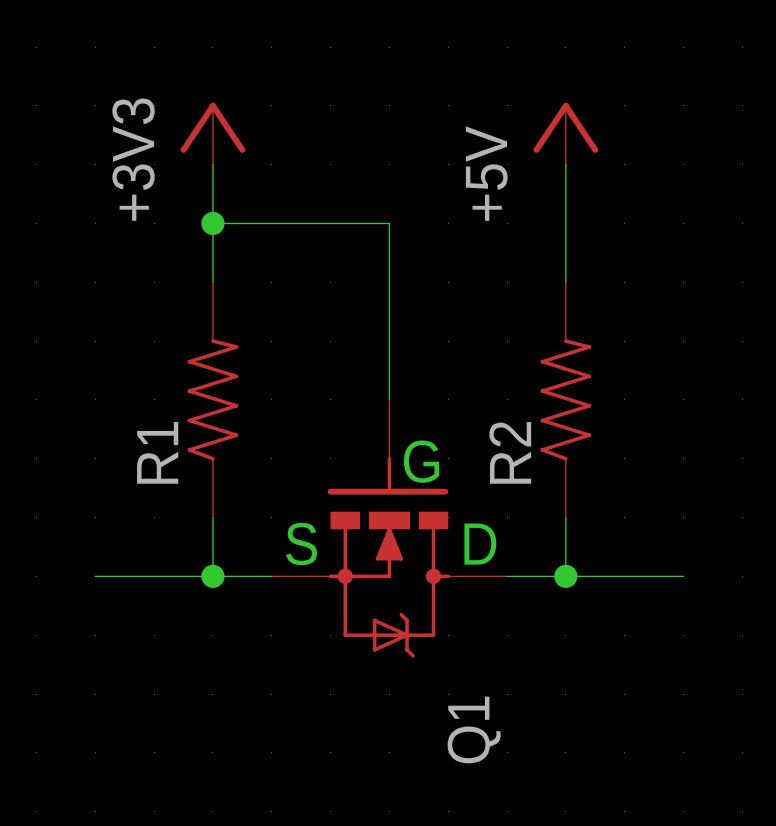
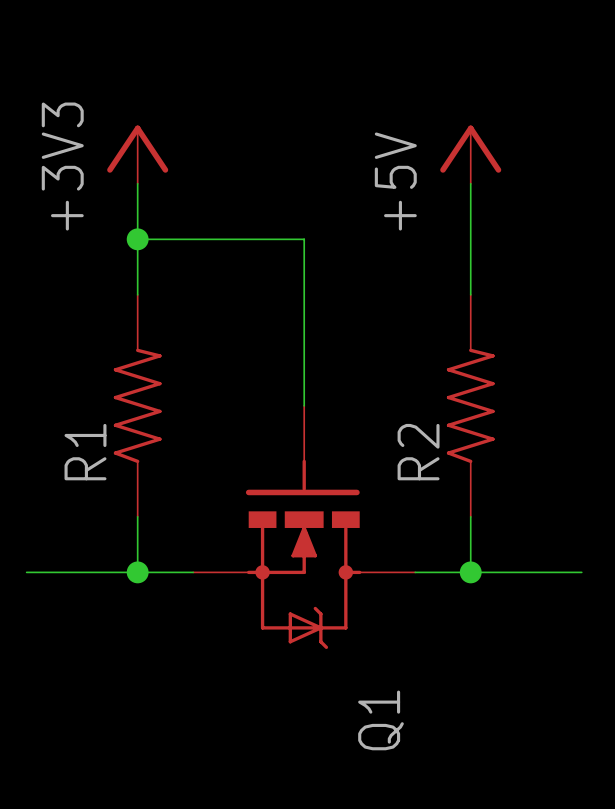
text: G (421, 461) -> none
text: S (301, 544) -> none
text: D (480, 544) -> none

